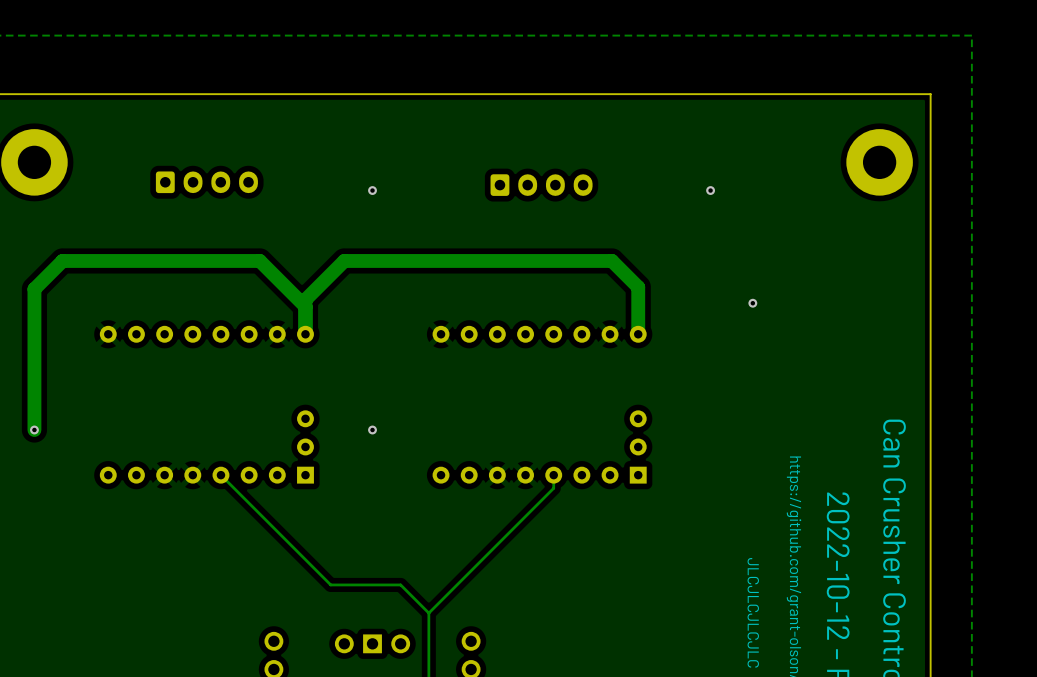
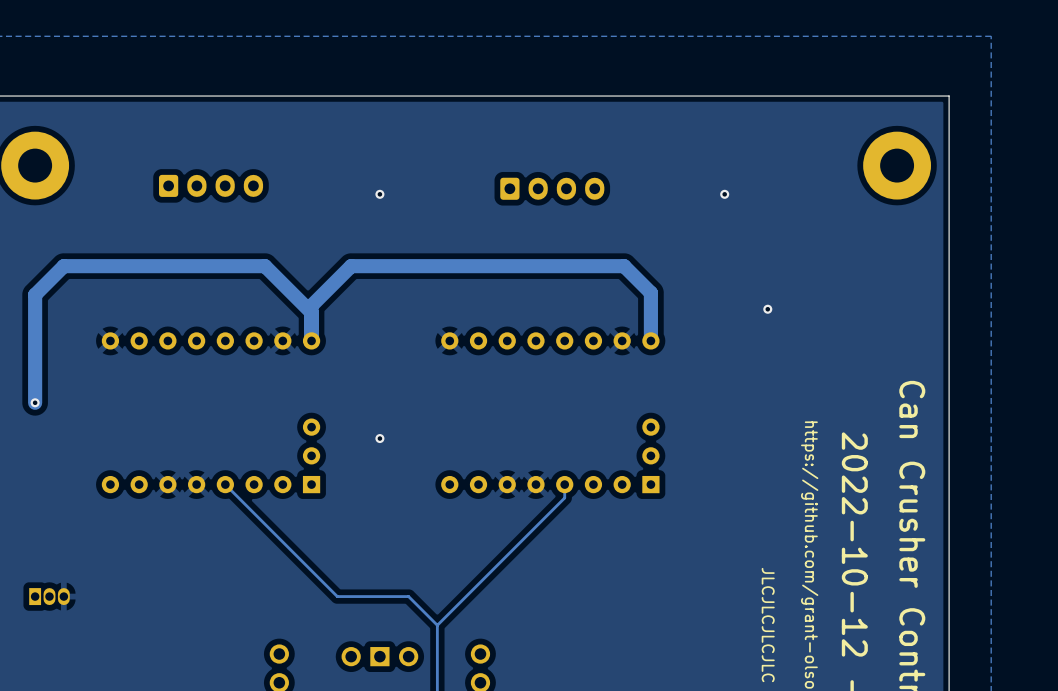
track: (34, 394) (34, 430) -> none
via position: (34, 430) -> (35, 402)
part: none -> (49, 596)

